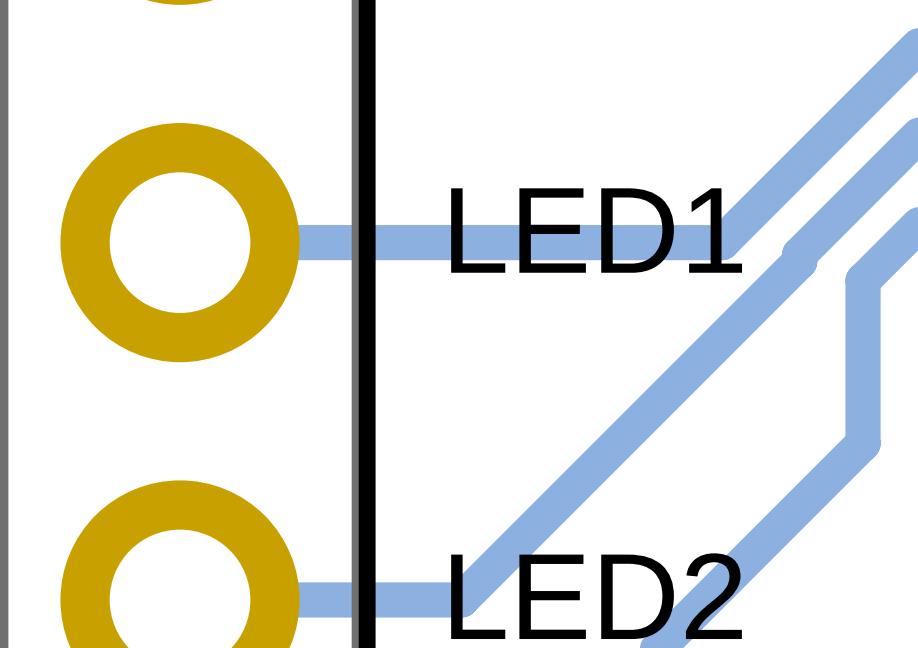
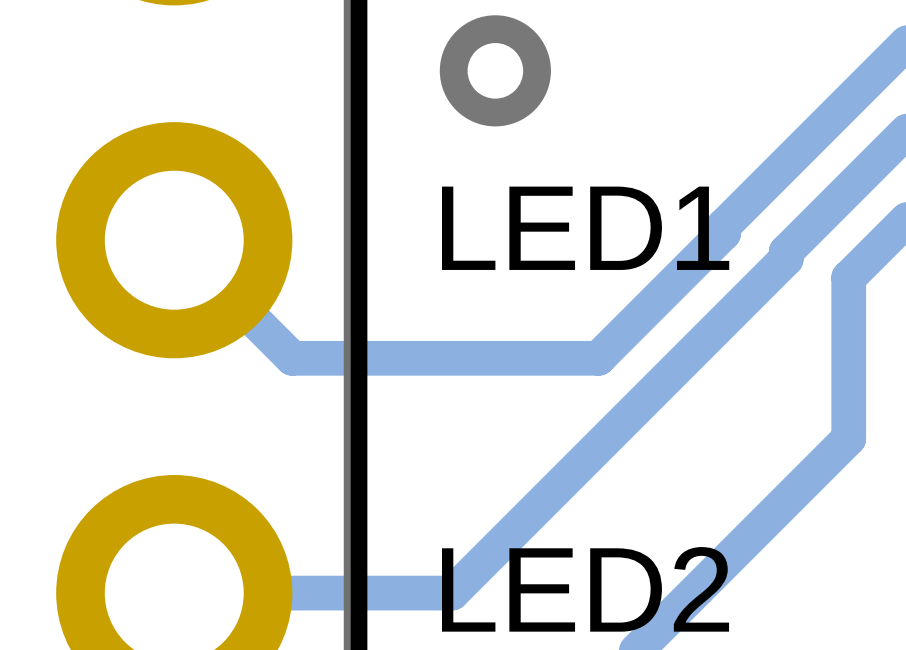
via: none -> (495, 70)
track: (736, 228) (722, 242) (180, 242) -> (723, 225) (723, 233) (598, 358) (292, 358) (174, 240)

